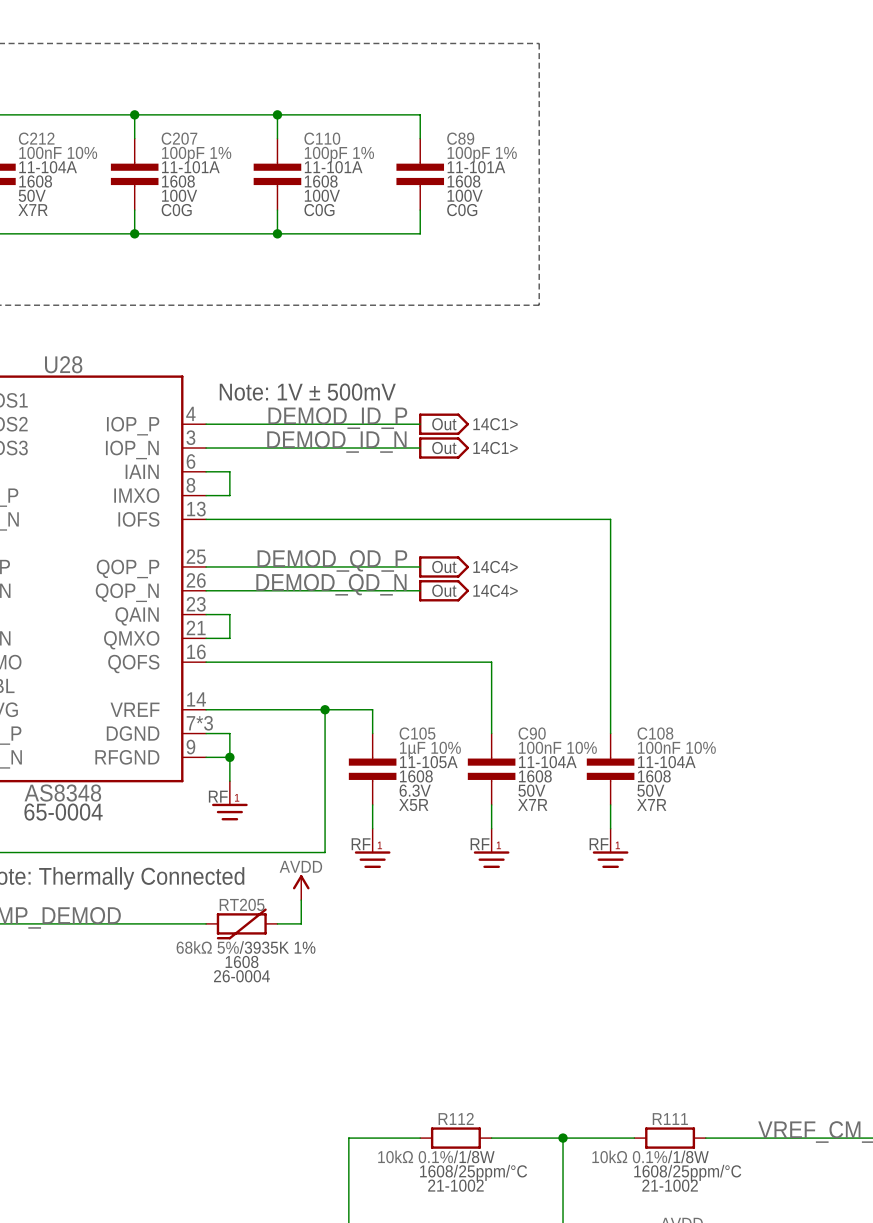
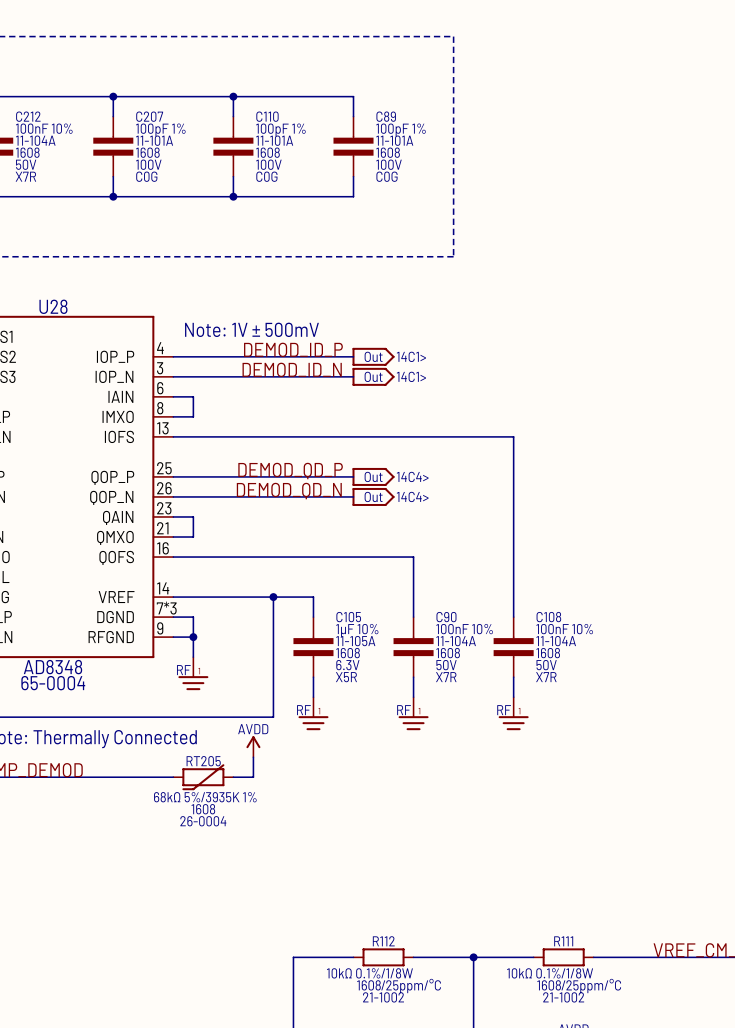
U28 value: AS8348 (62, 793) -> AD8348 (53, 667)

